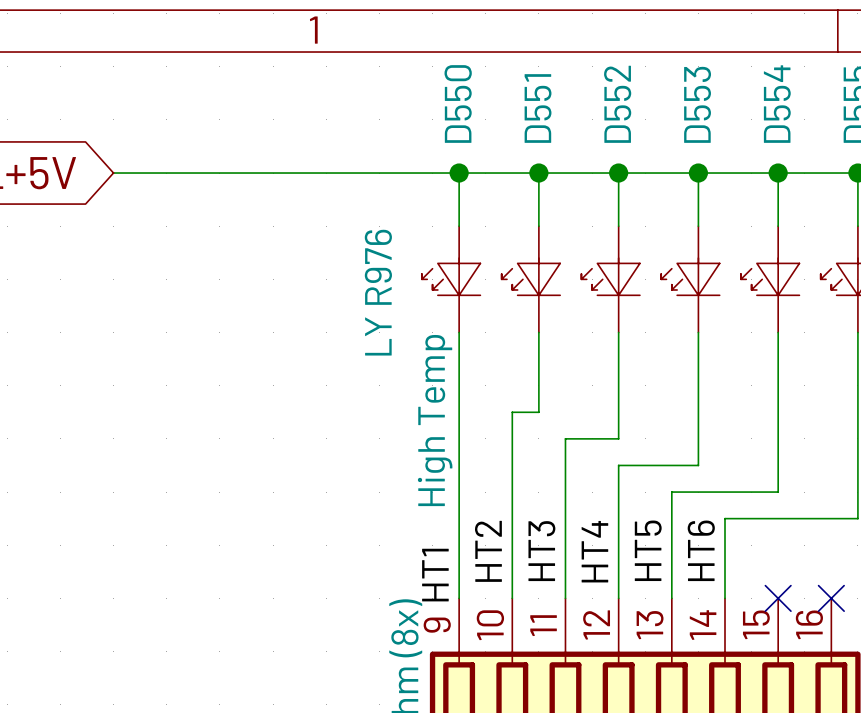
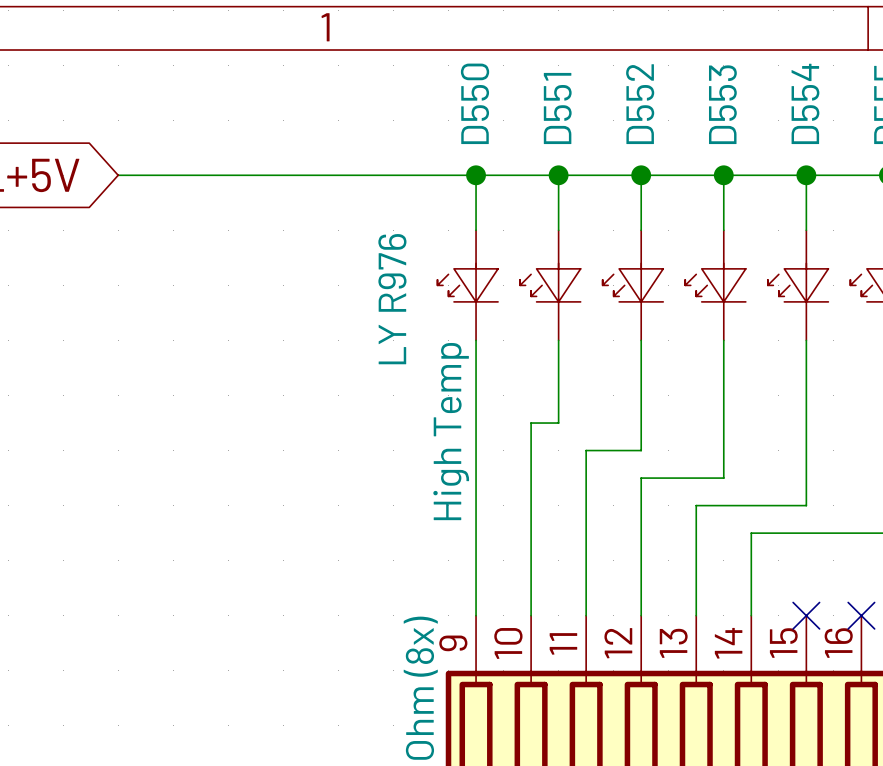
label: HT5 (648, 550) -> none
label: HT6 (701, 550) -> none
label: HT2 (488, 551) -> none
label: HT3 (541, 551) -> none
label: HT4 (594, 551) -> none
label: HT1 (435, 575) -> none

